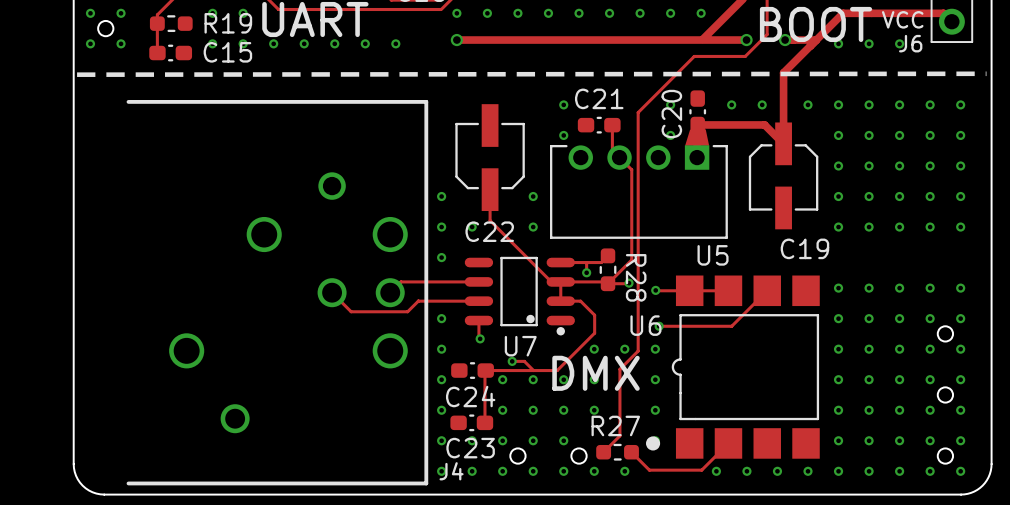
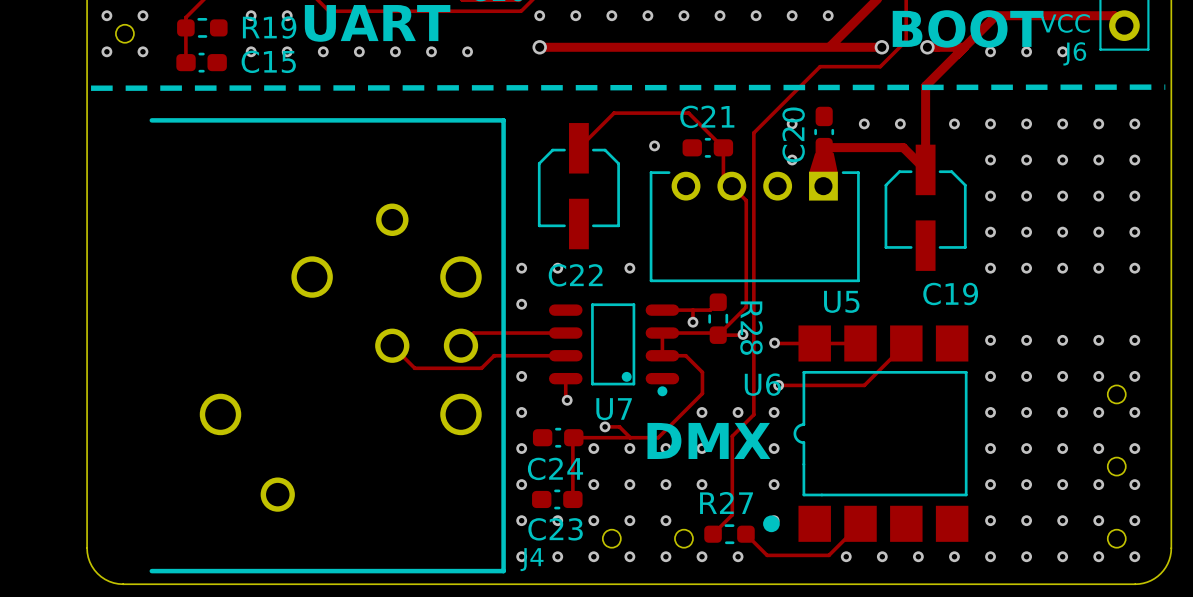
via: (563, 104) -> none
via: none -> (654, 145)
track: none -> (723, 147) (688, 113) (614, 113) (578, 148)
via: (563, 135) -> none
C22 rotation: 0° (490, 157) -> 180° (578, 186)
track: (490, 189) (490, 220) (551, 281) -> none
via: (441, 196) -> none
via: (533, 196) -> none

